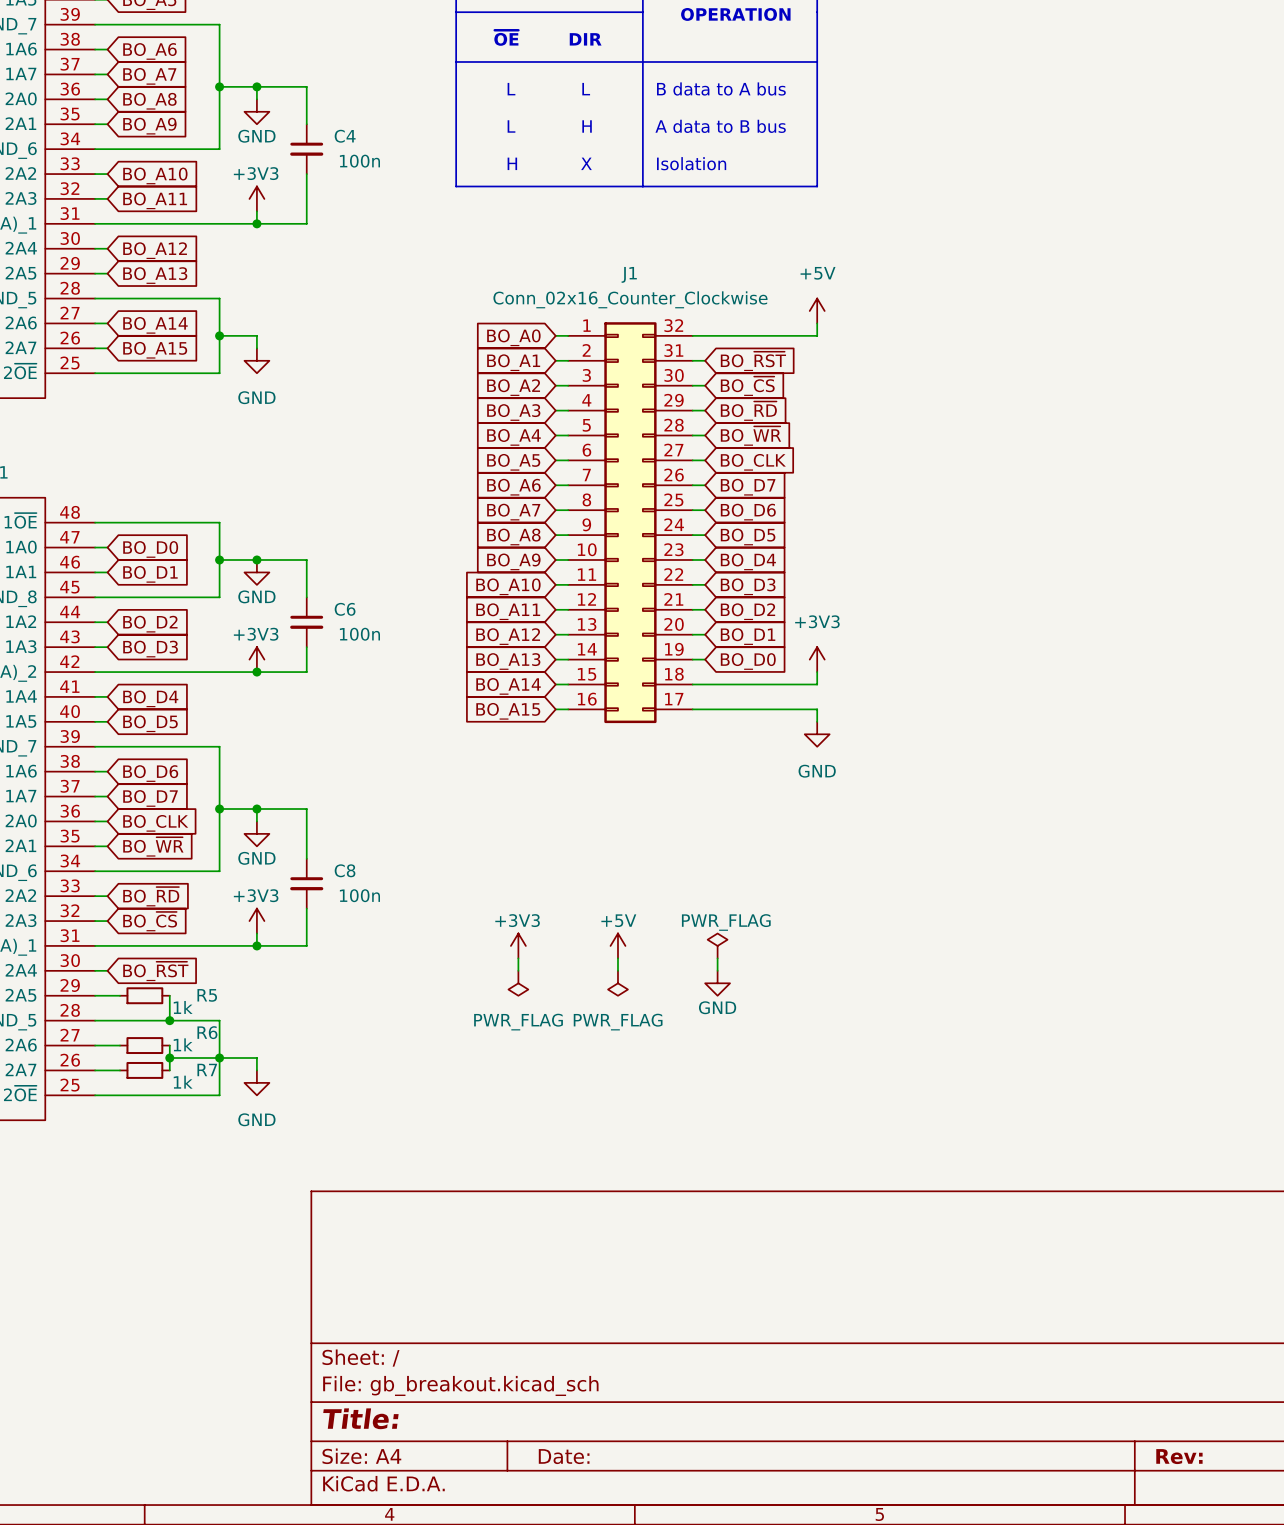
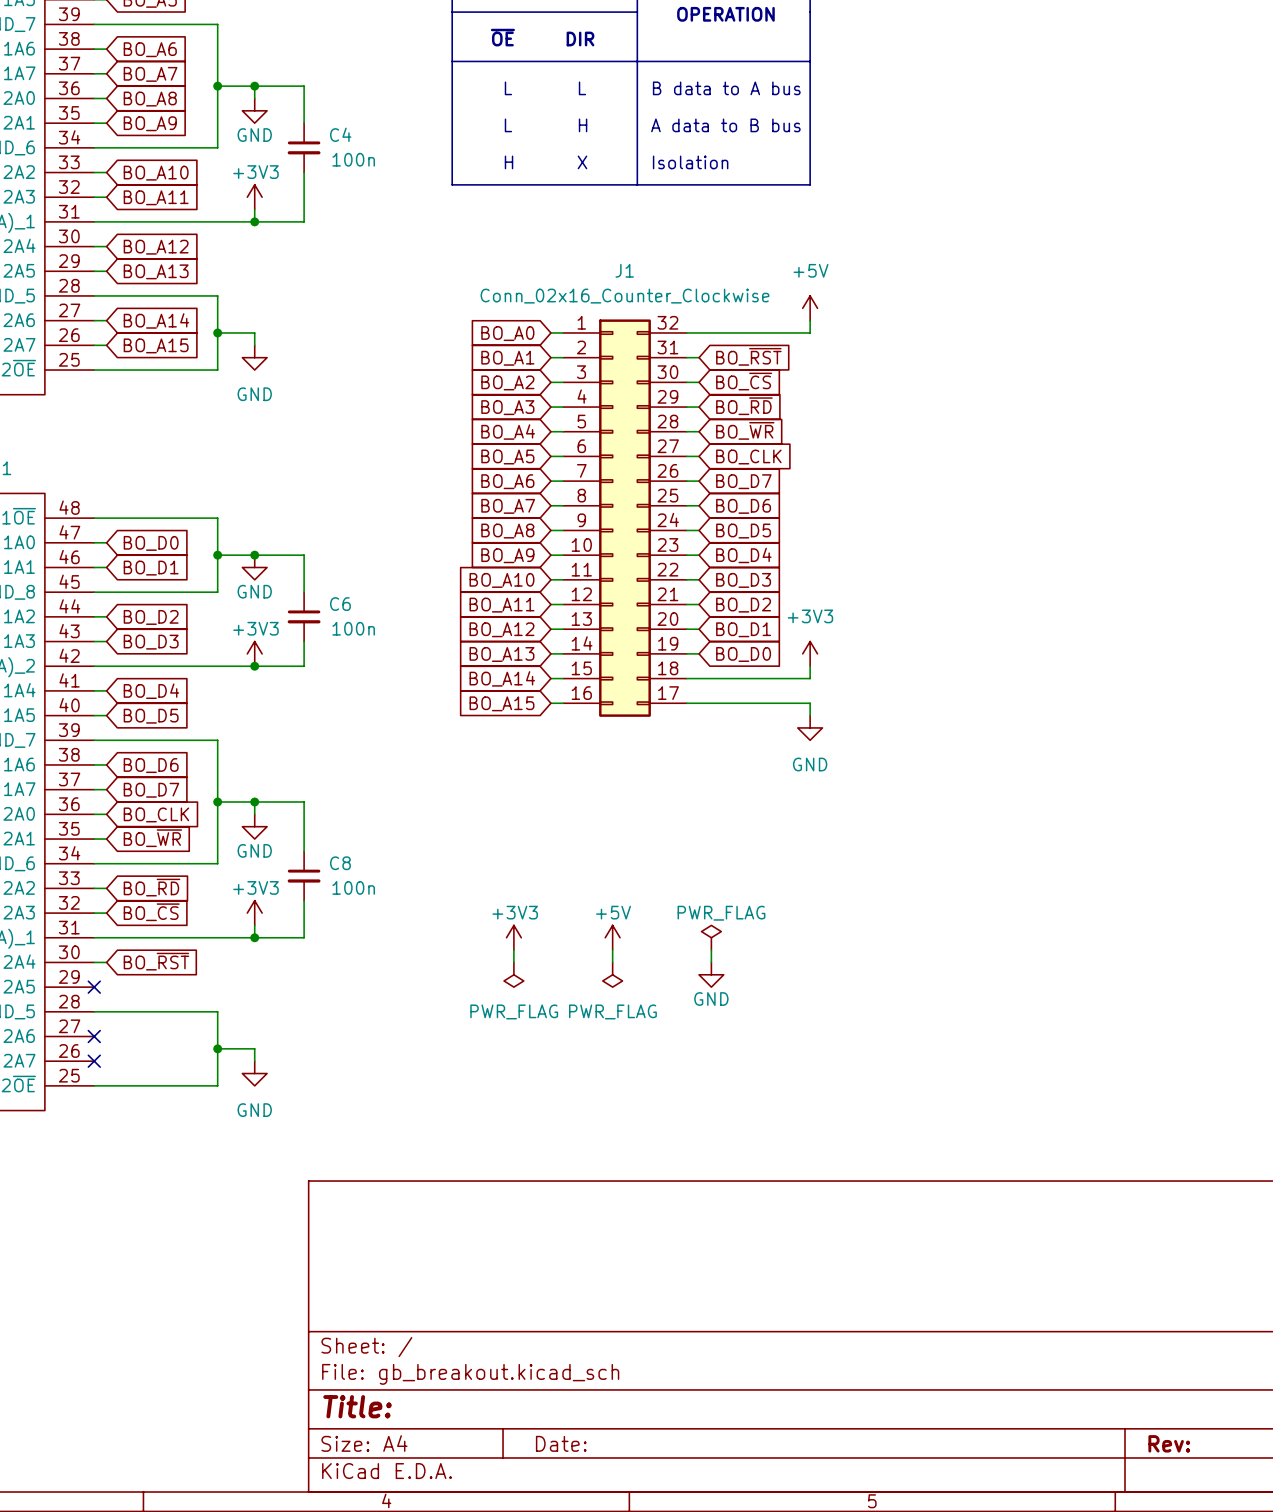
wire: (95, 995) (119, 995) -> none
no-connect mark: none -> (94, 987)
R5: 1k (144, 995) -> none
wire: (169, 995) (169, 1020) -> none
junction: (169, 1020) -> none
wire: (95, 1045) (119, 1045) -> none
no-connect mark: none -> (94, 1036)
R6: 1k (144, 1045) -> none
wire: (169, 1045) (169, 1070) -> none
wire: (169, 1058) (219, 1058) -> none
junction: (169, 1058) -> none
wire: (95, 1070) (119, 1070) -> none
no-connect mark: none -> (94, 1061)
R7: 1k (144, 1070) -> none

